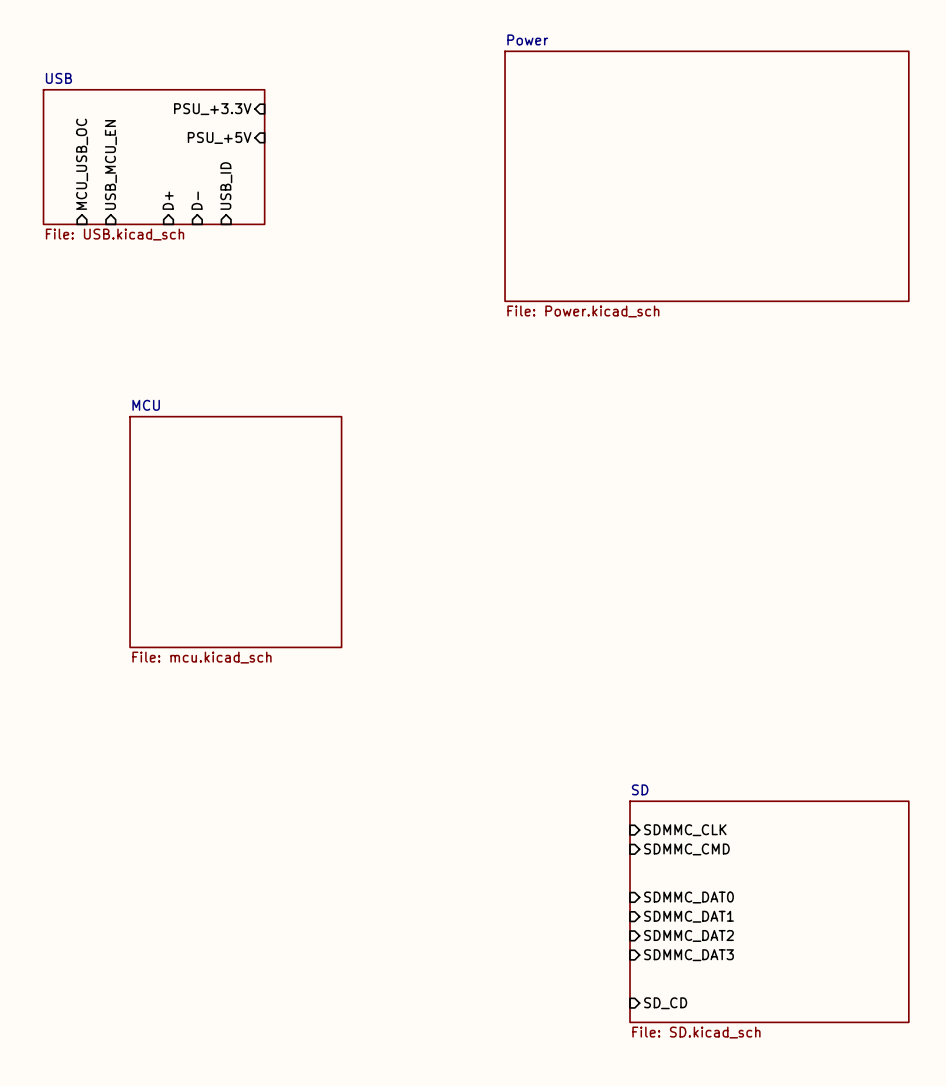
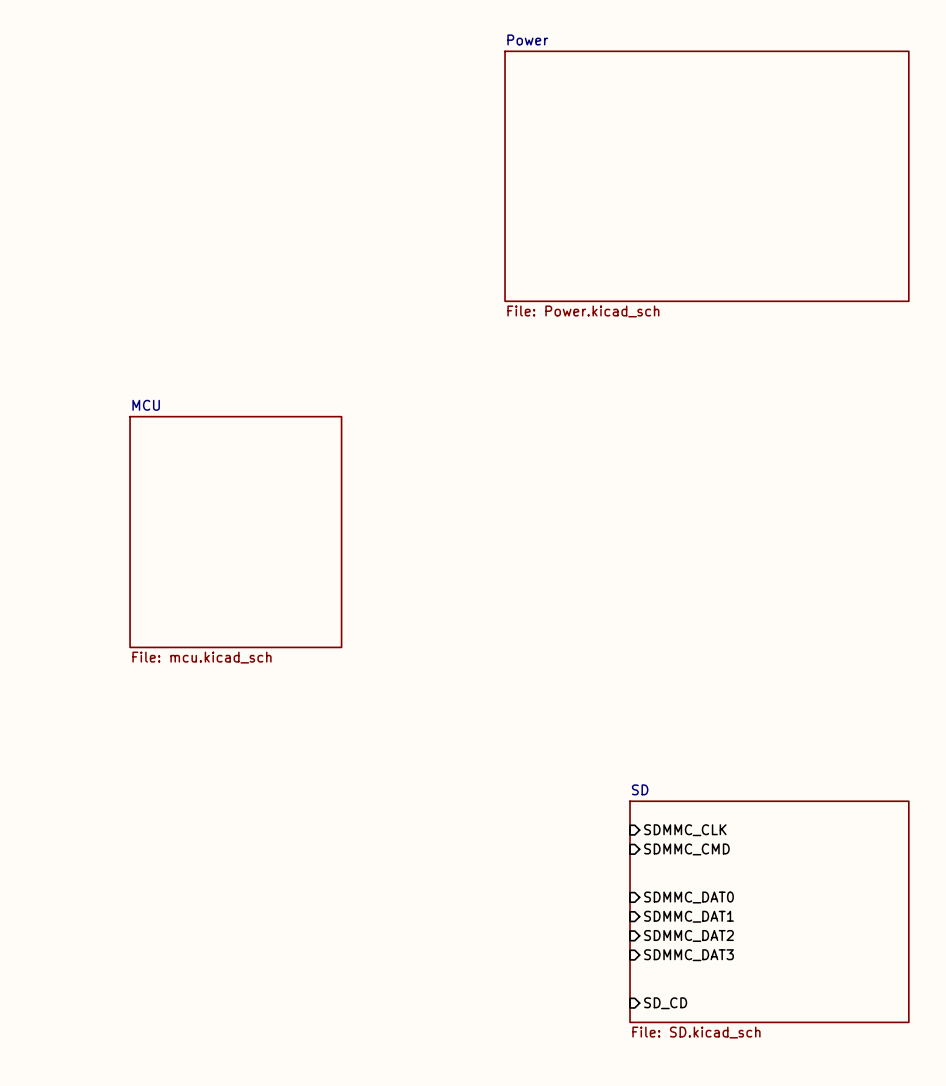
sheet pin: PSU_+3.3V (212, 109) -> none
sheet pin: PSU_+5V (219, 137) -> none
sheet USB: File: USB.kicad_sch (154, 157) -> none
sheet pin: MCU_USB_OC (82, 164) -> none
sheet pin: USB_MCU_EN (110, 164) -> none
sheet pin: USB_ID (226, 186) -> none
sheet pin: D+ (168, 200) -> none
sheet pin: D- (196, 200) -> none

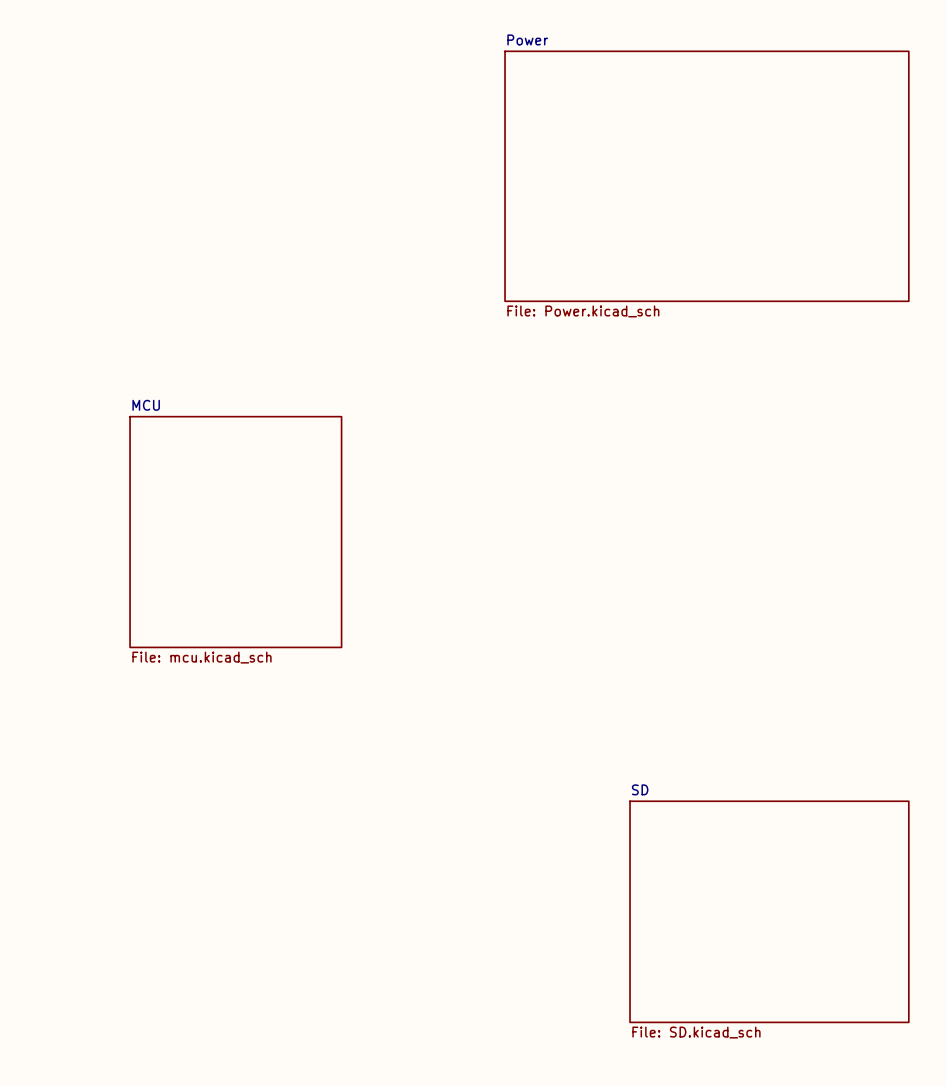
sheet pin: SDMMC_CLK (685, 830) -> none
sheet pin: SDMMC_CMD (686, 849) -> none
sheet pin: SDMMC_DAT0 (688, 897) -> none
sheet pin: SDMMC_DAT1 (688, 916) -> none
sheet pin: SDMMC_DAT2 (688, 935) -> none
sheet pin: SDMMC_DAT3 (688, 955) -> none
sheet pin: SD_CD (665, 1003) -> none

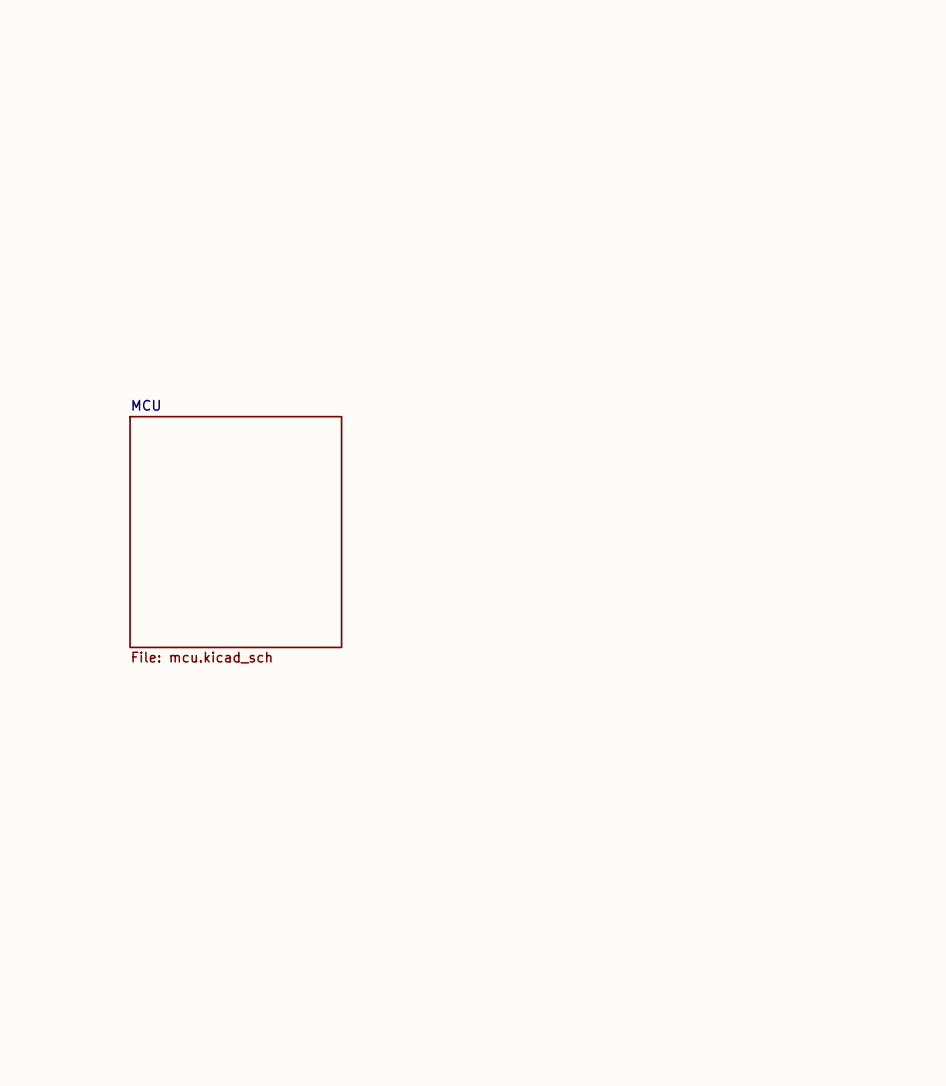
sheet Power: File: Power.kicad_sch (706, 176) -> none
sheet SD: File: SD.kicad_sch (769, 911) -> none

